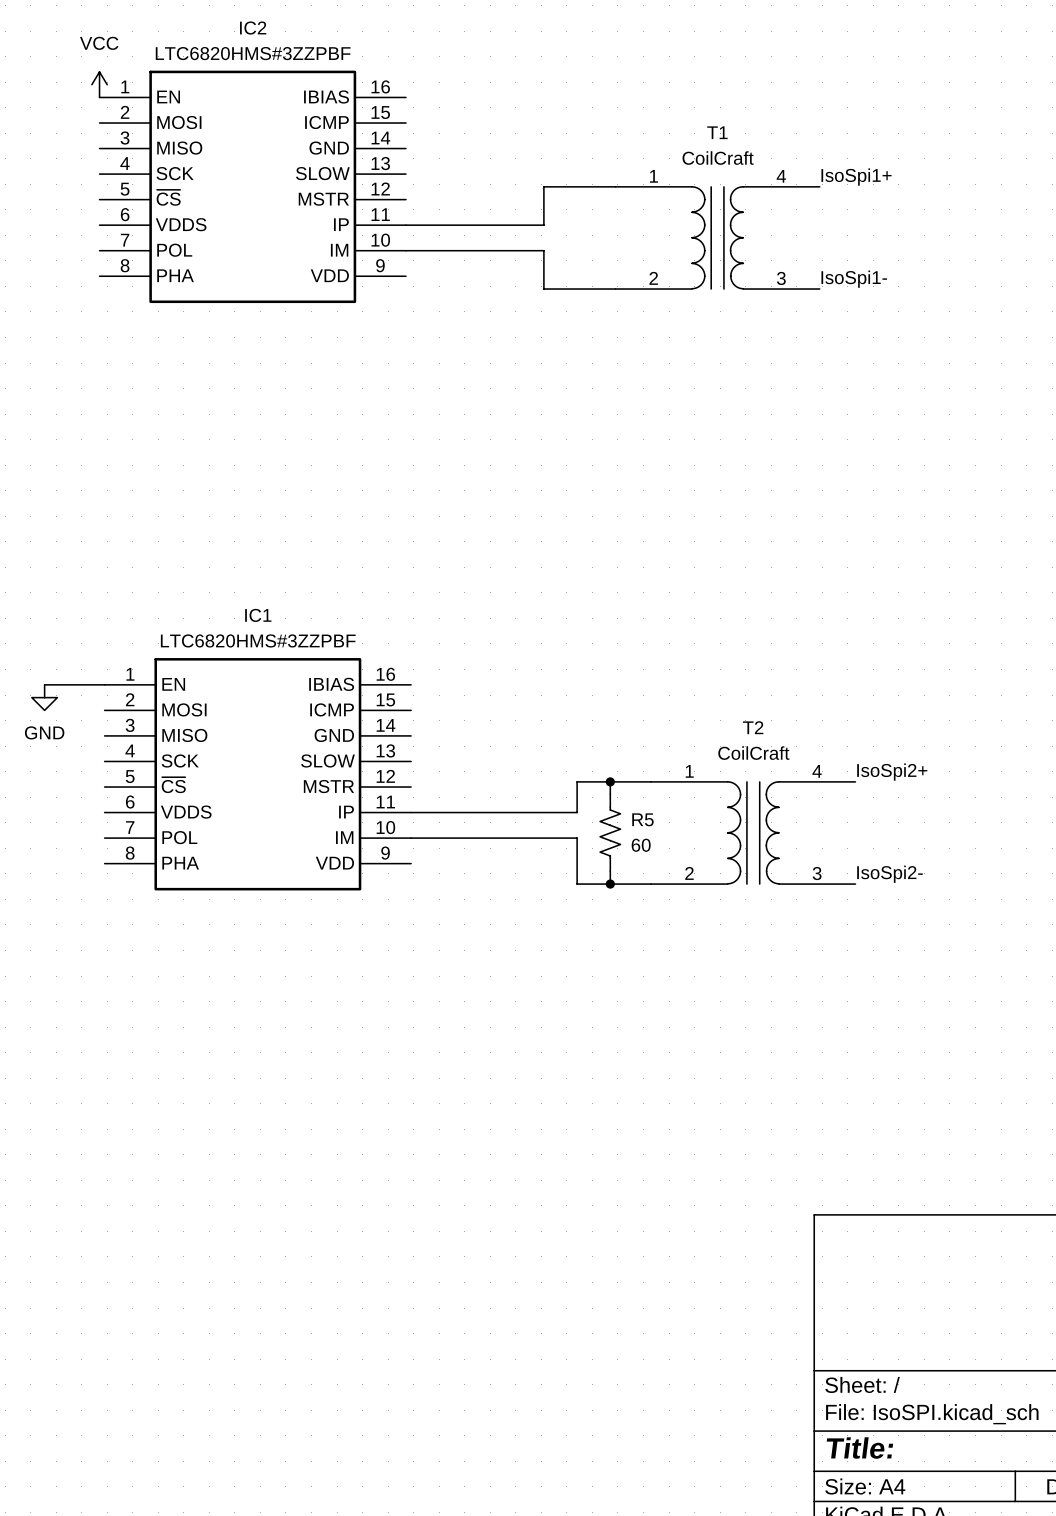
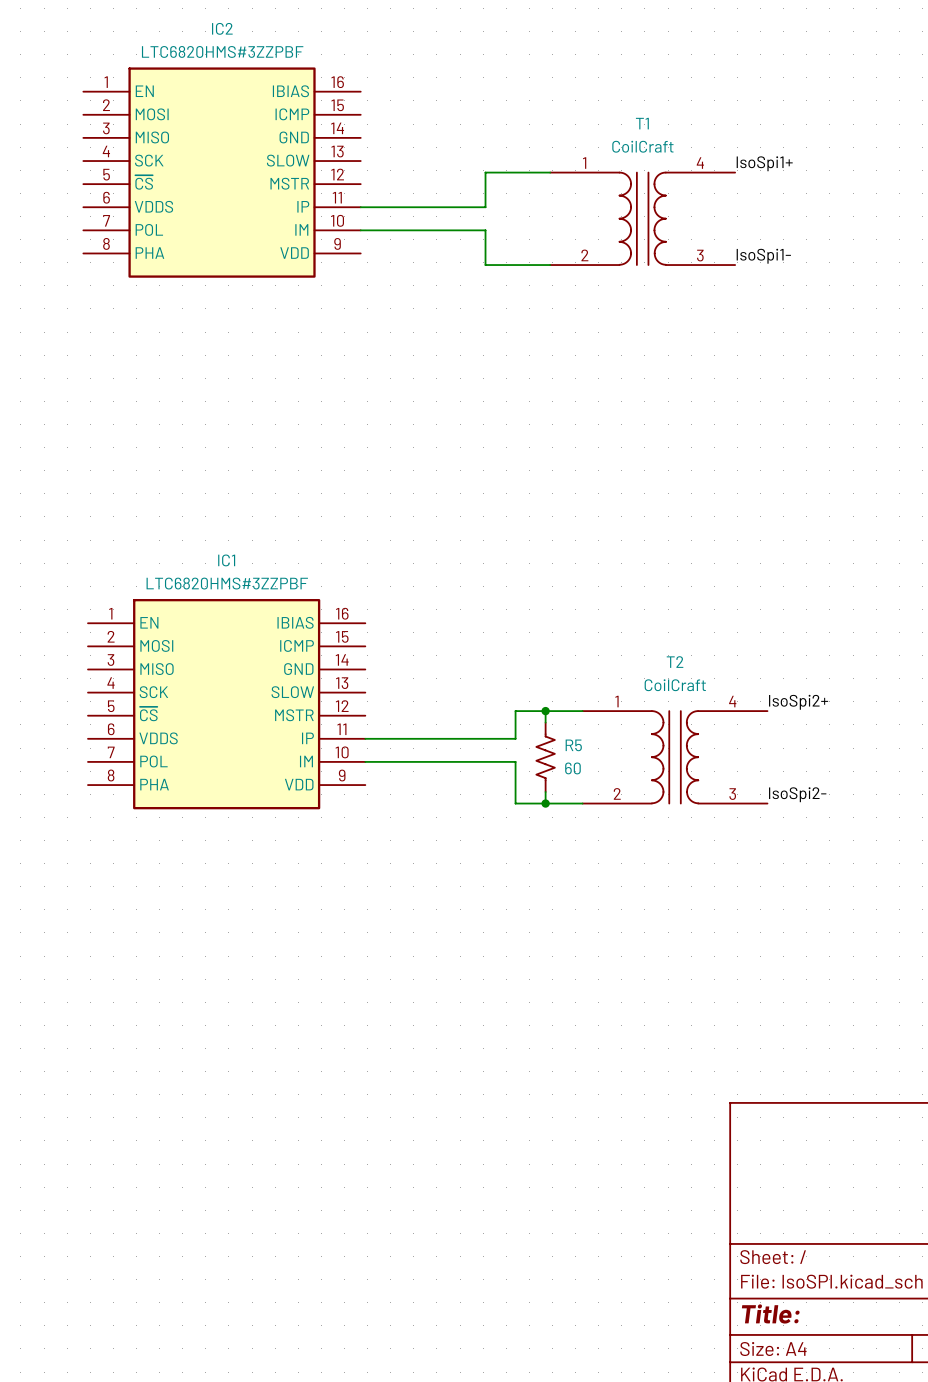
power symbol: VCC (99, 84) -> none
wire: (44, 684) (104, 684) -> none
power symbol: GND (44, 697) -> none

